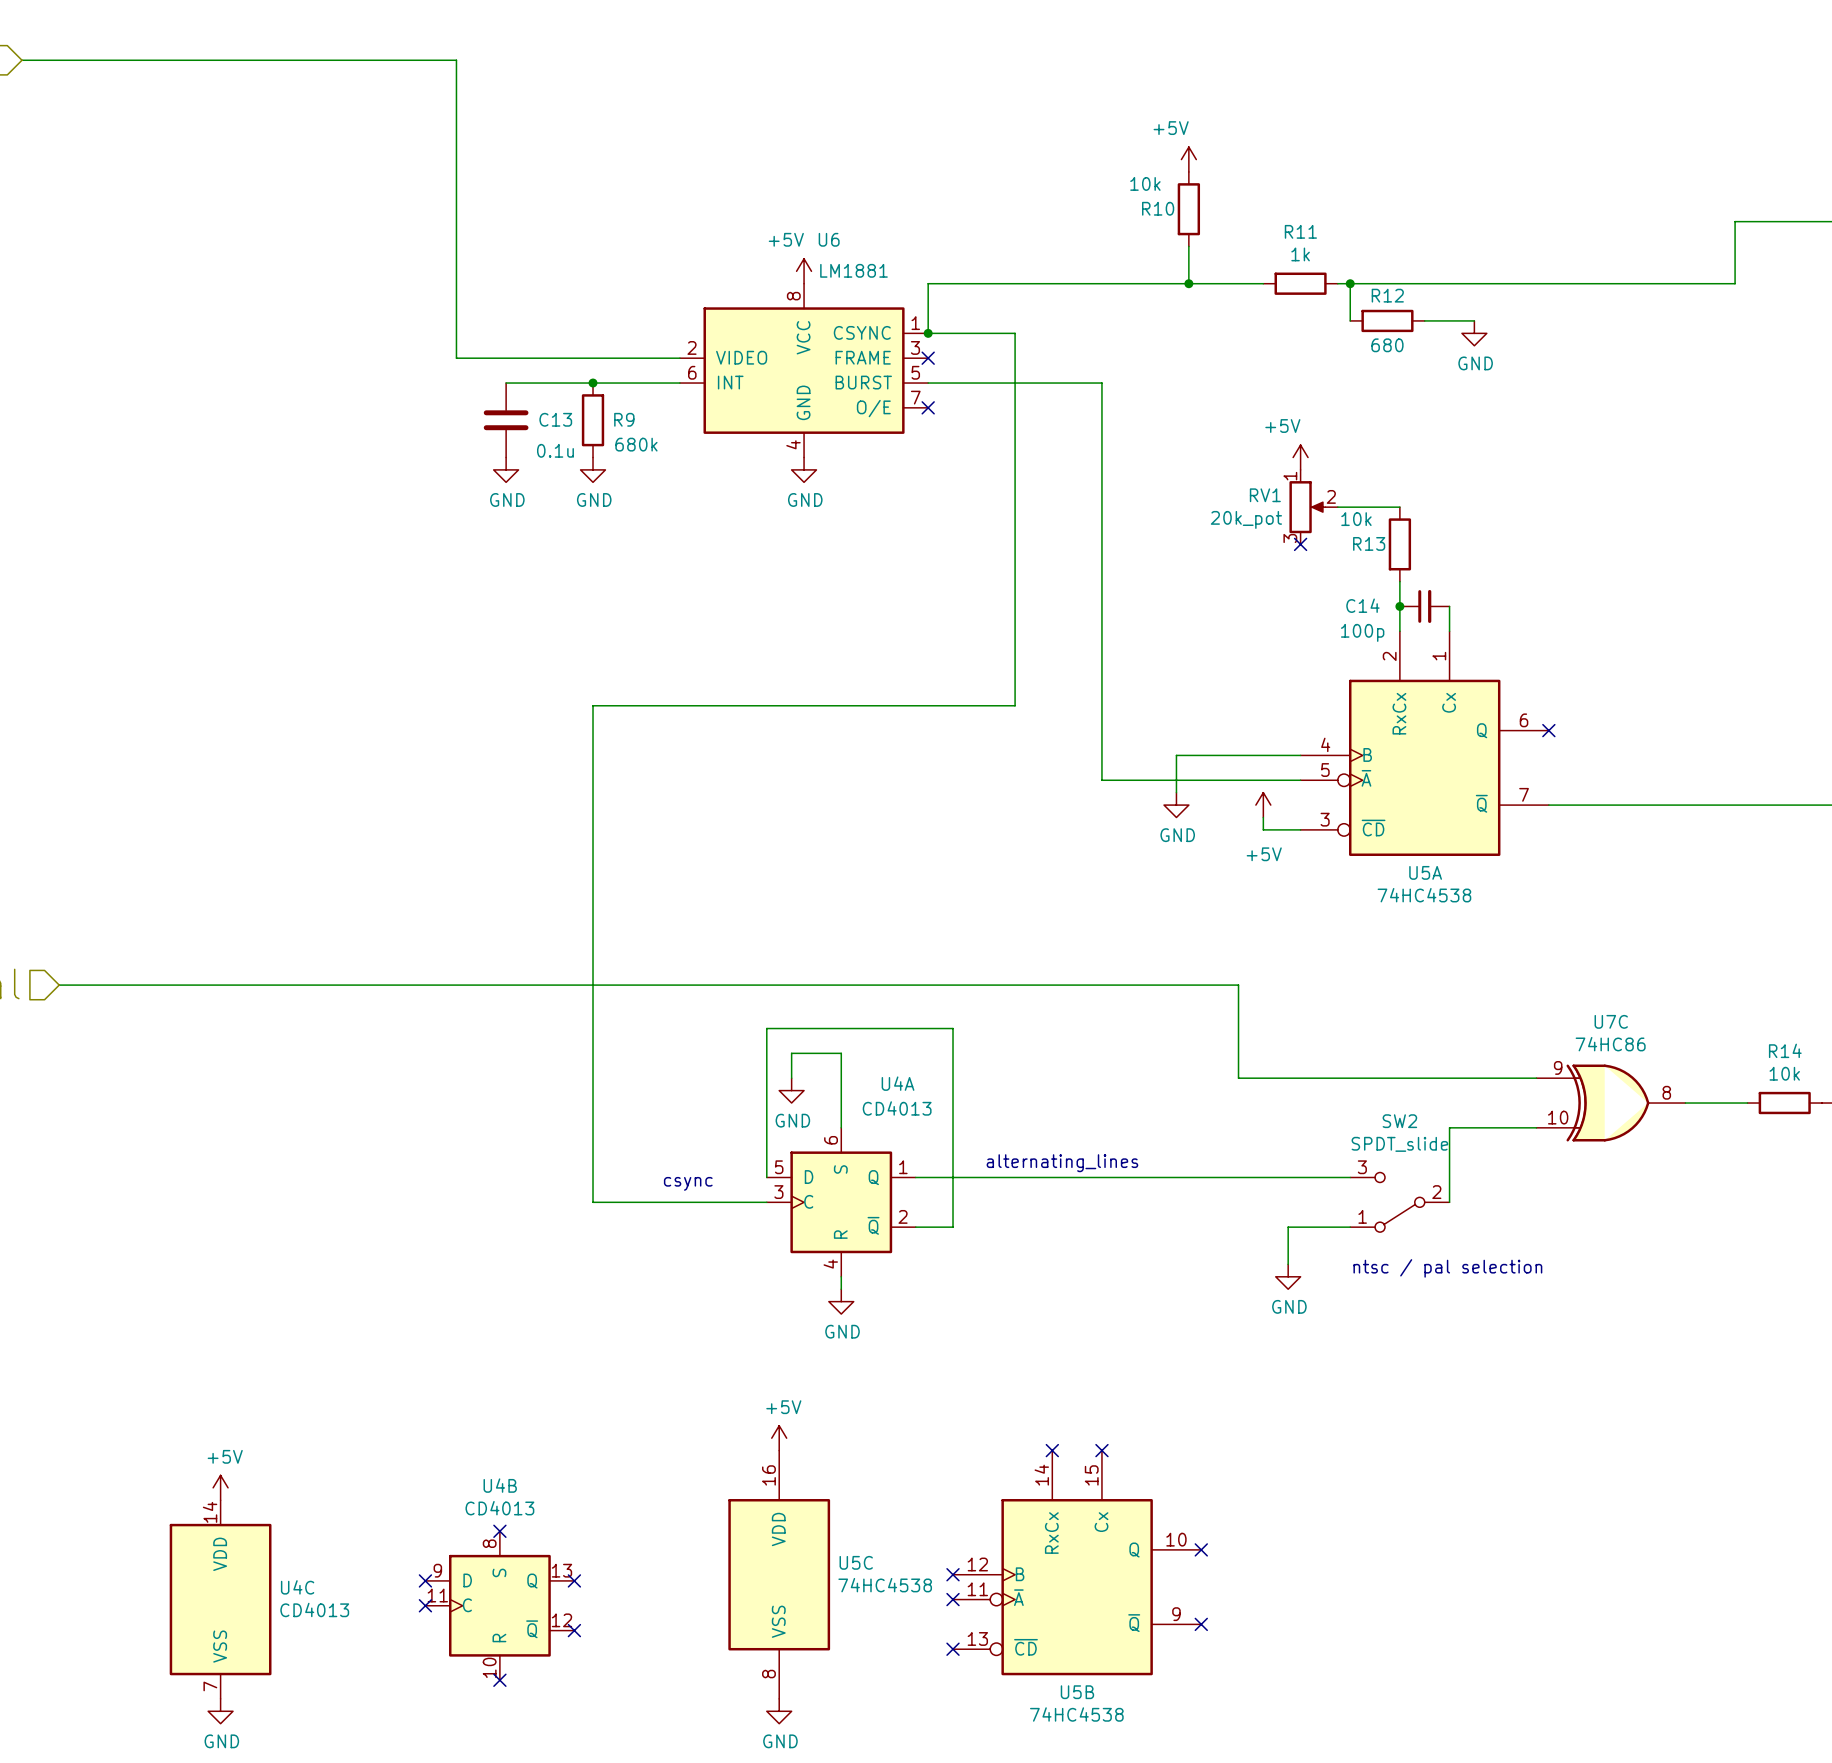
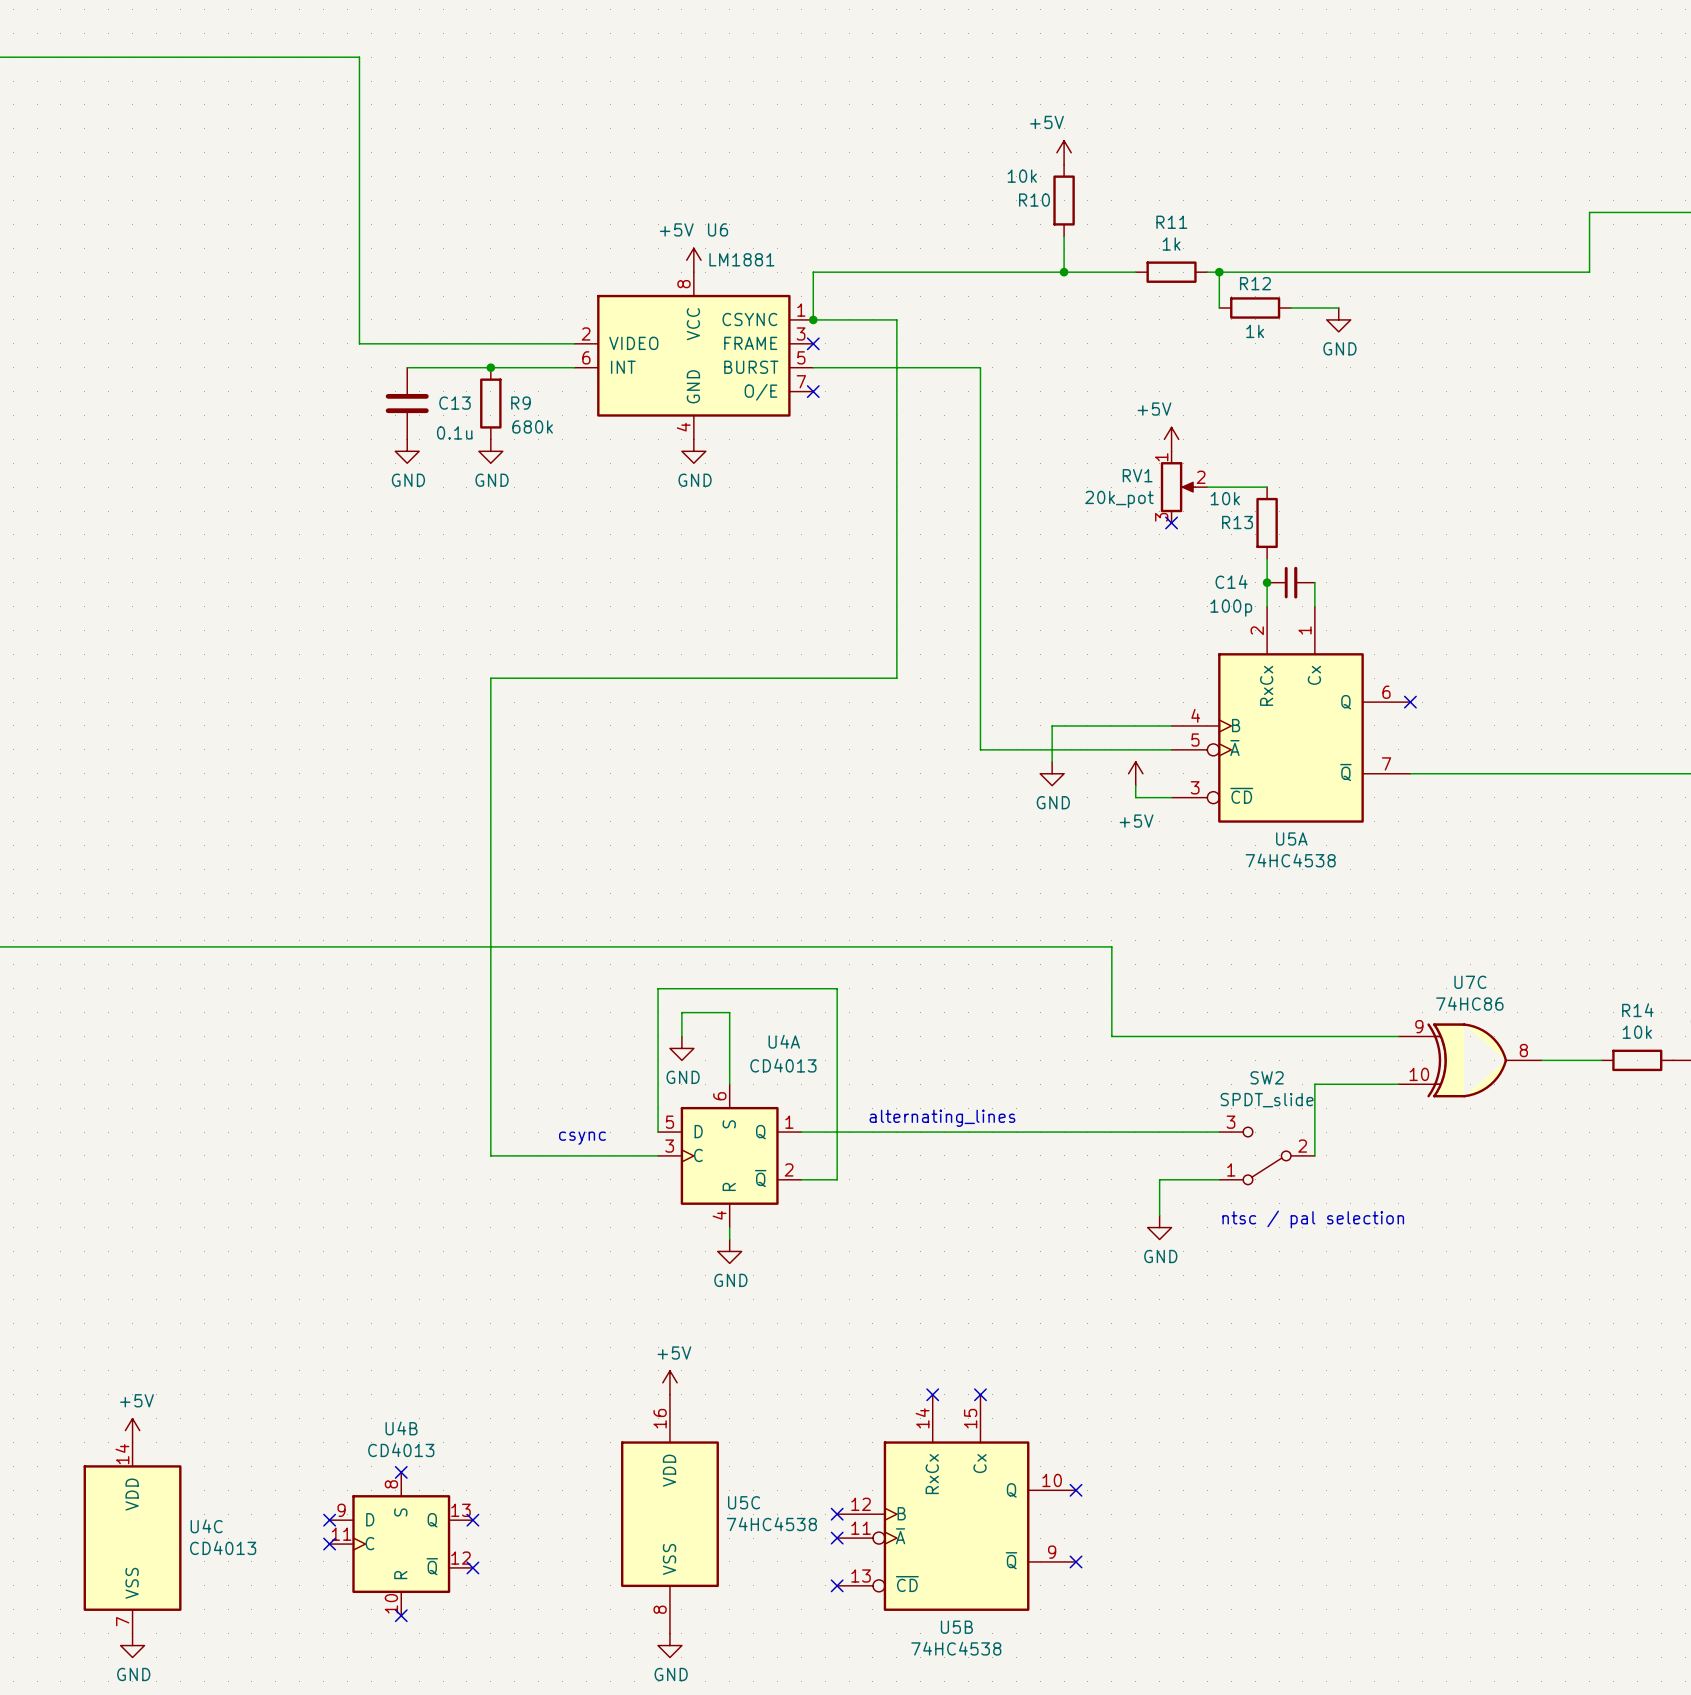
R12 value: 680 (1387, 345) -> 1k (1255, 331)

